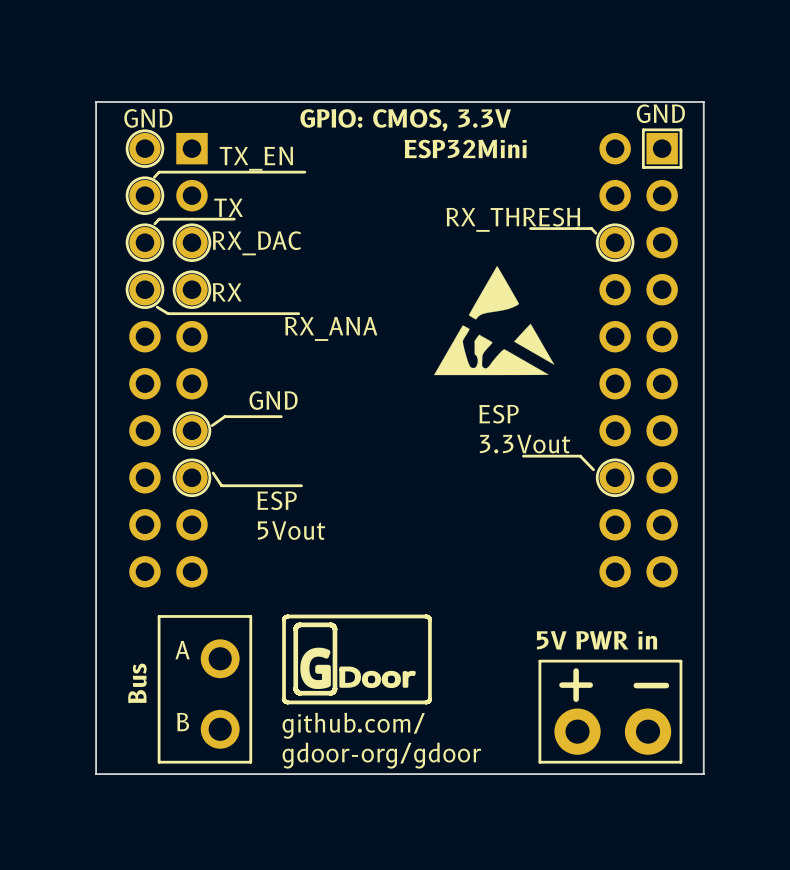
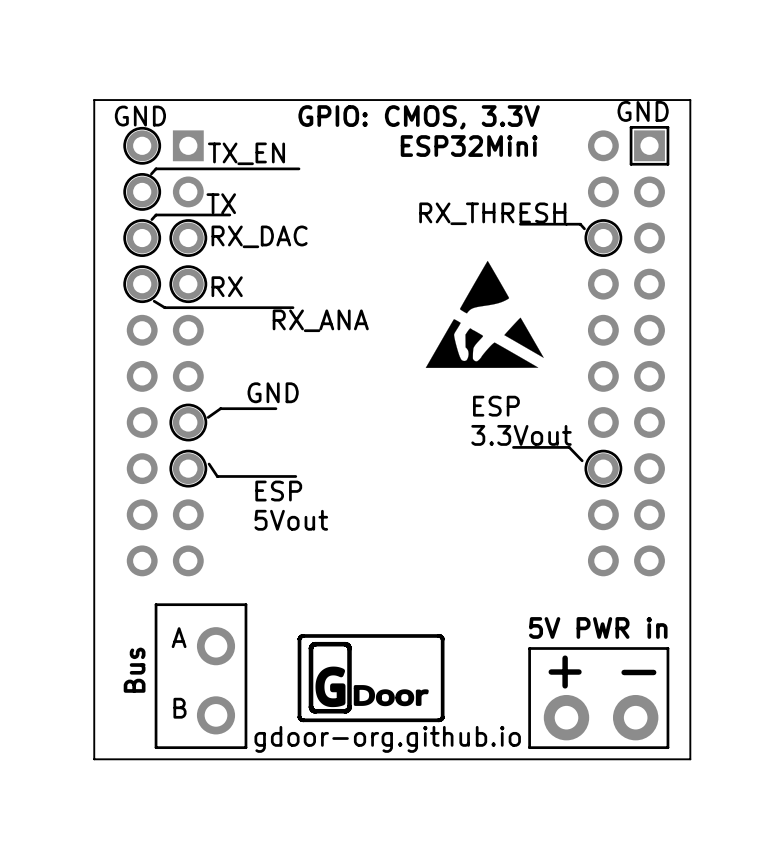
line: (425, 616) (288, 616) -> (438, 635) (303, 635)
line: (284, 619) (284, 699) -> (299, 639) (299, 716)
line: (429, 619) (429, 699) -> (442, 639) (442, 716)
line: (330, 624) (300, 624) -> (344, 644) (315, 644)
line: (295, 629) (295, 688) -> (311, 648) (311, 706)
line: (334, 629) (334, 688) -> (349, 648) (349, 706)
drawing position: (315, 668) -> (330, 686)
drawing: [361, 670, 401, 689] -> none
drawing position: (350, 677) -> (364, 695)
drawing position: (409, 679) -> (422, 697)
line: (330, 693) (300, 693) -> (344, 711) (315, 711)
drawing: none -> [375, 689, 415, 707]
line: (425, 702) (288, 702) -> (438, 720) (303, 720)
text: github.com/ (353, 725) -> none
text: gdoor-org/gdoor (381, 755) -> gdoor-org.github.io (387, 739)

